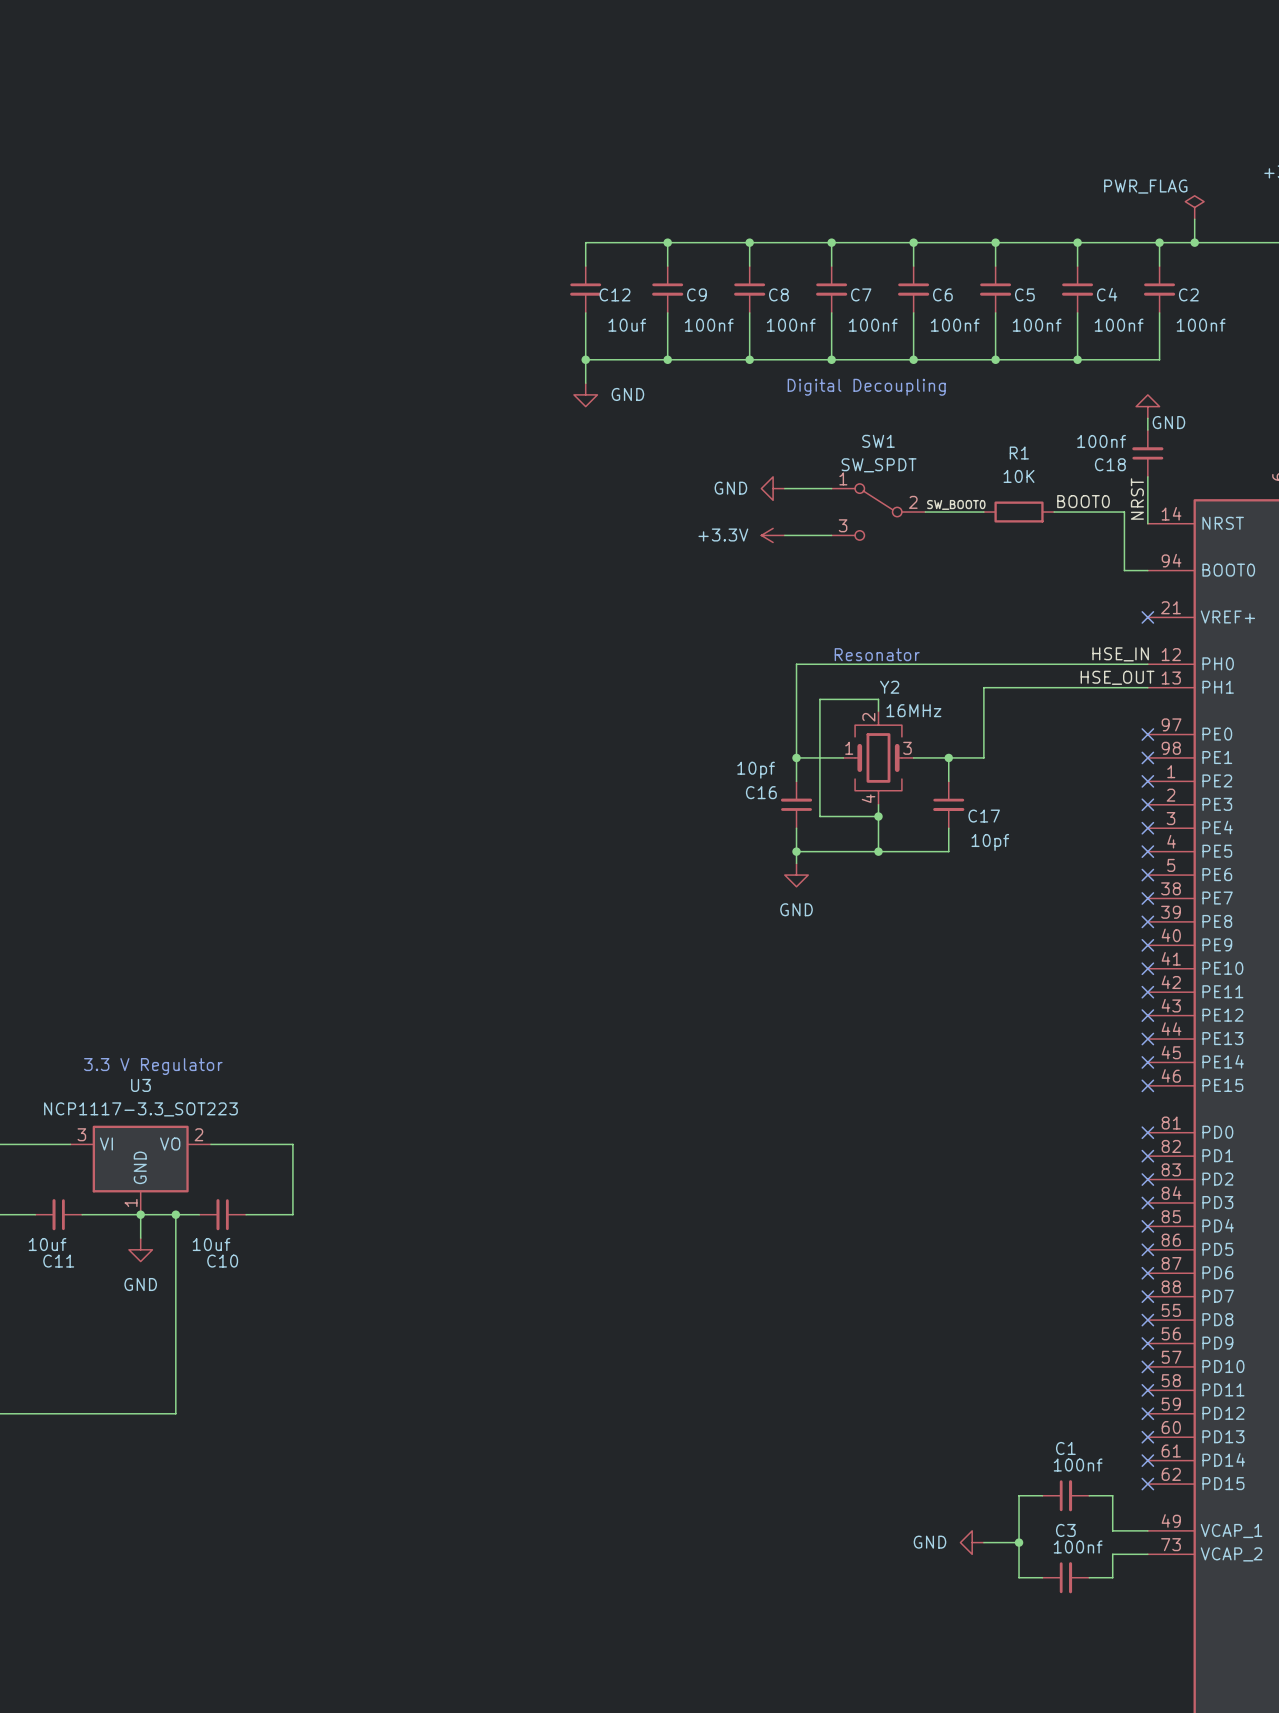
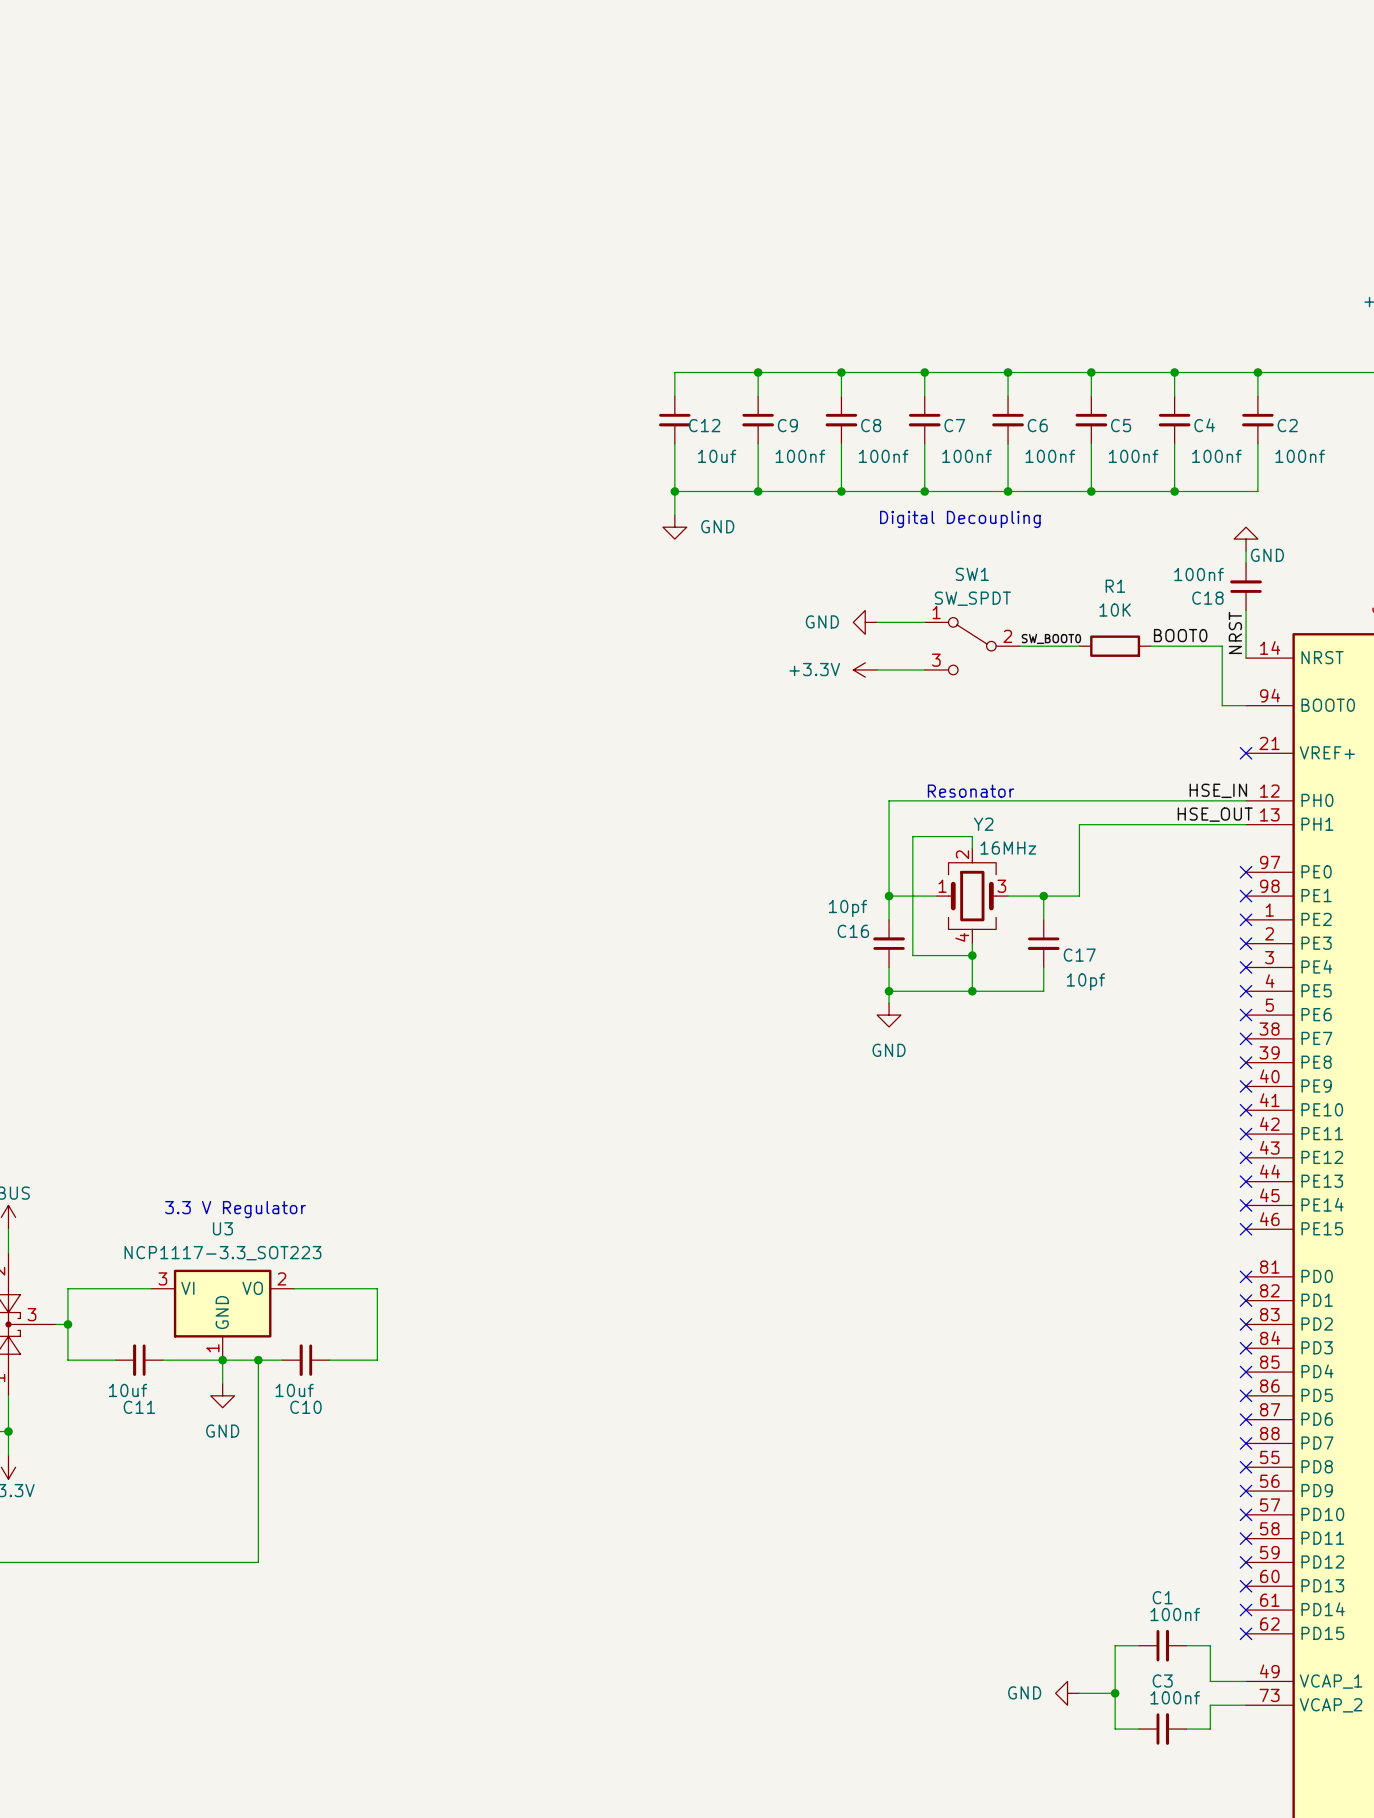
power symbol: PWR_FLAG (1194, 207) -> none
wire: (1194, 219) (1194, 242) -> none
junction: (1194, 242) -> none

